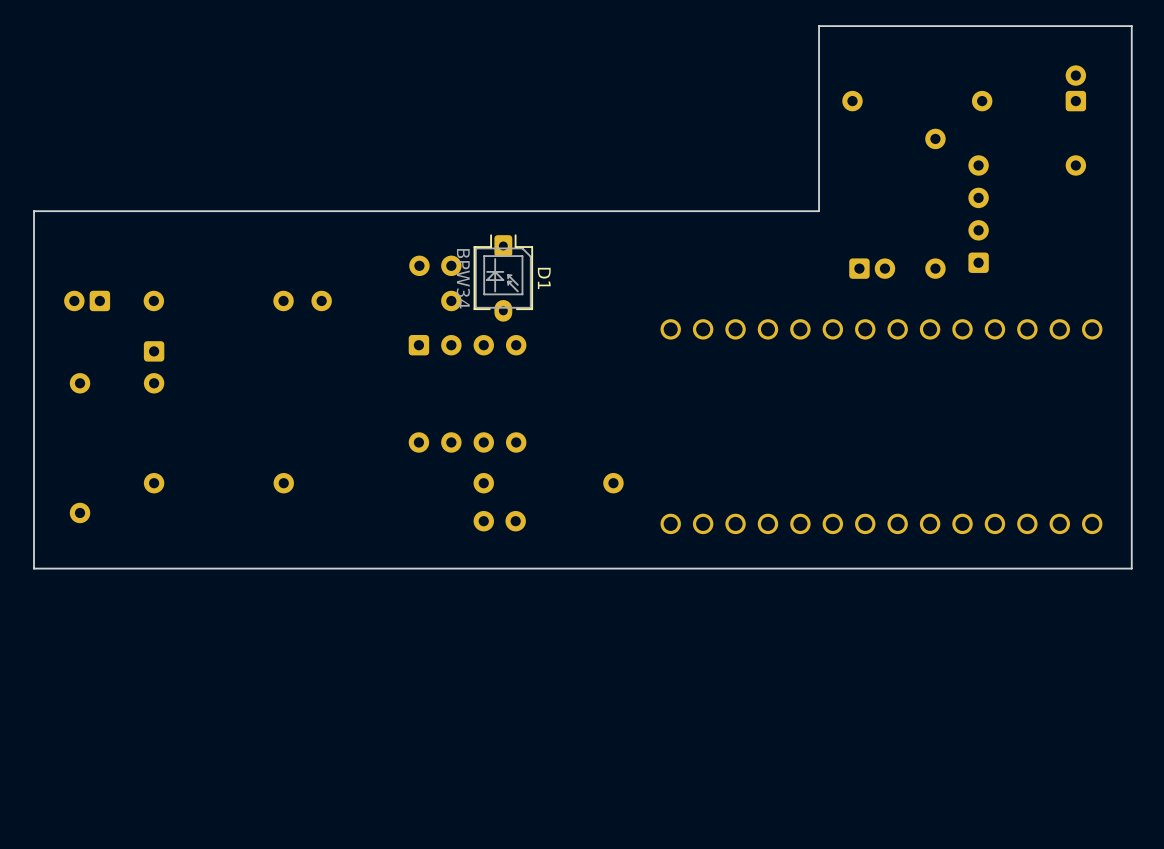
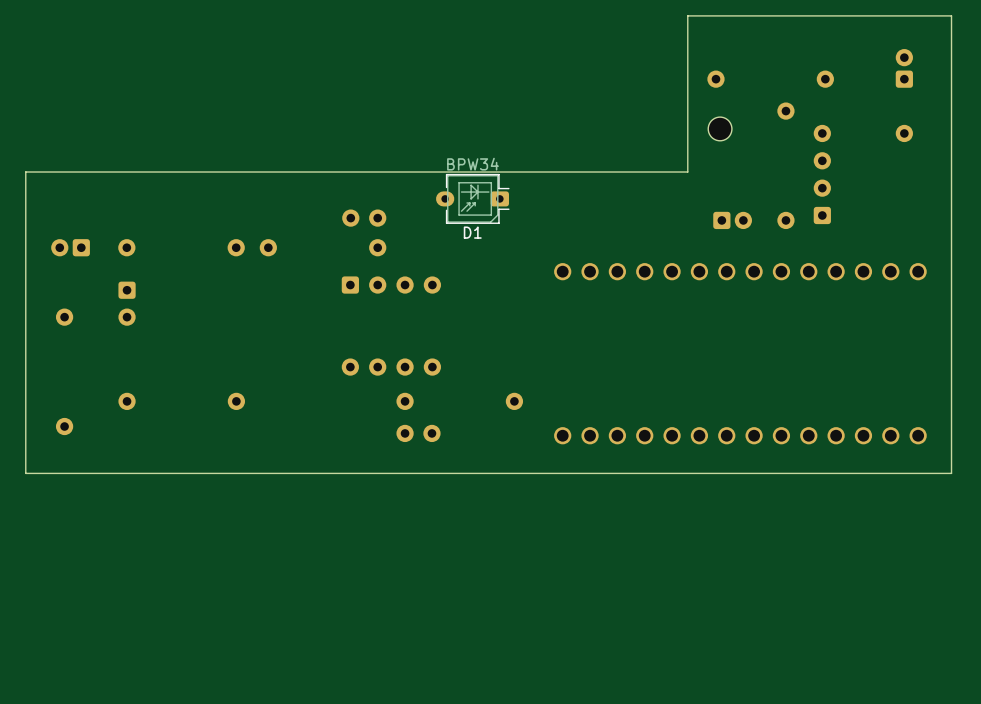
part: none -> (720, 128)
D1 rotation: 0° (503, 278) -> 90° clockwise (472, 198)
D1 position: (503, 278) -> (472, 198)

